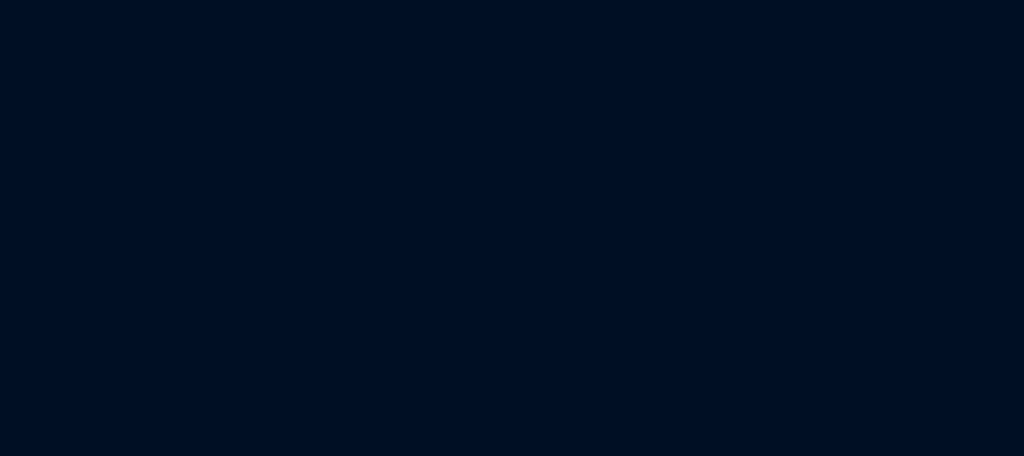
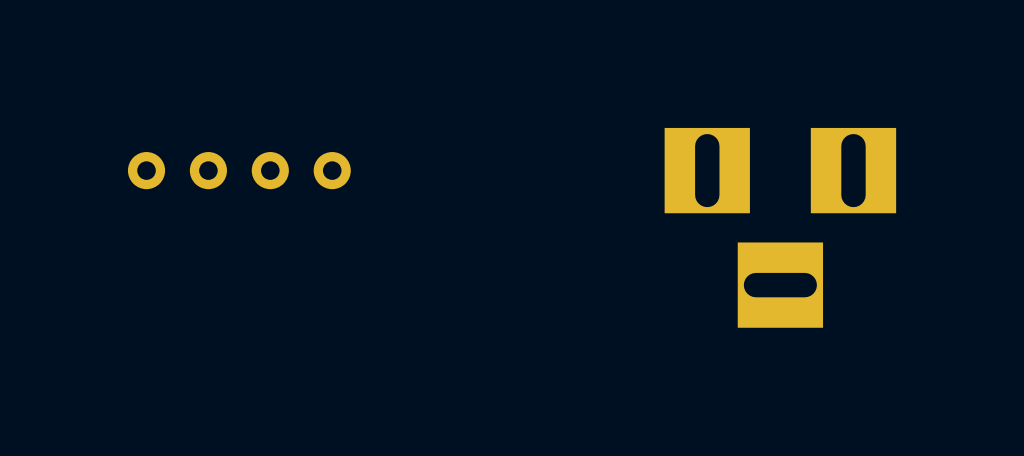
part: none -> (239, 170)
part: none -> (780, 227)

